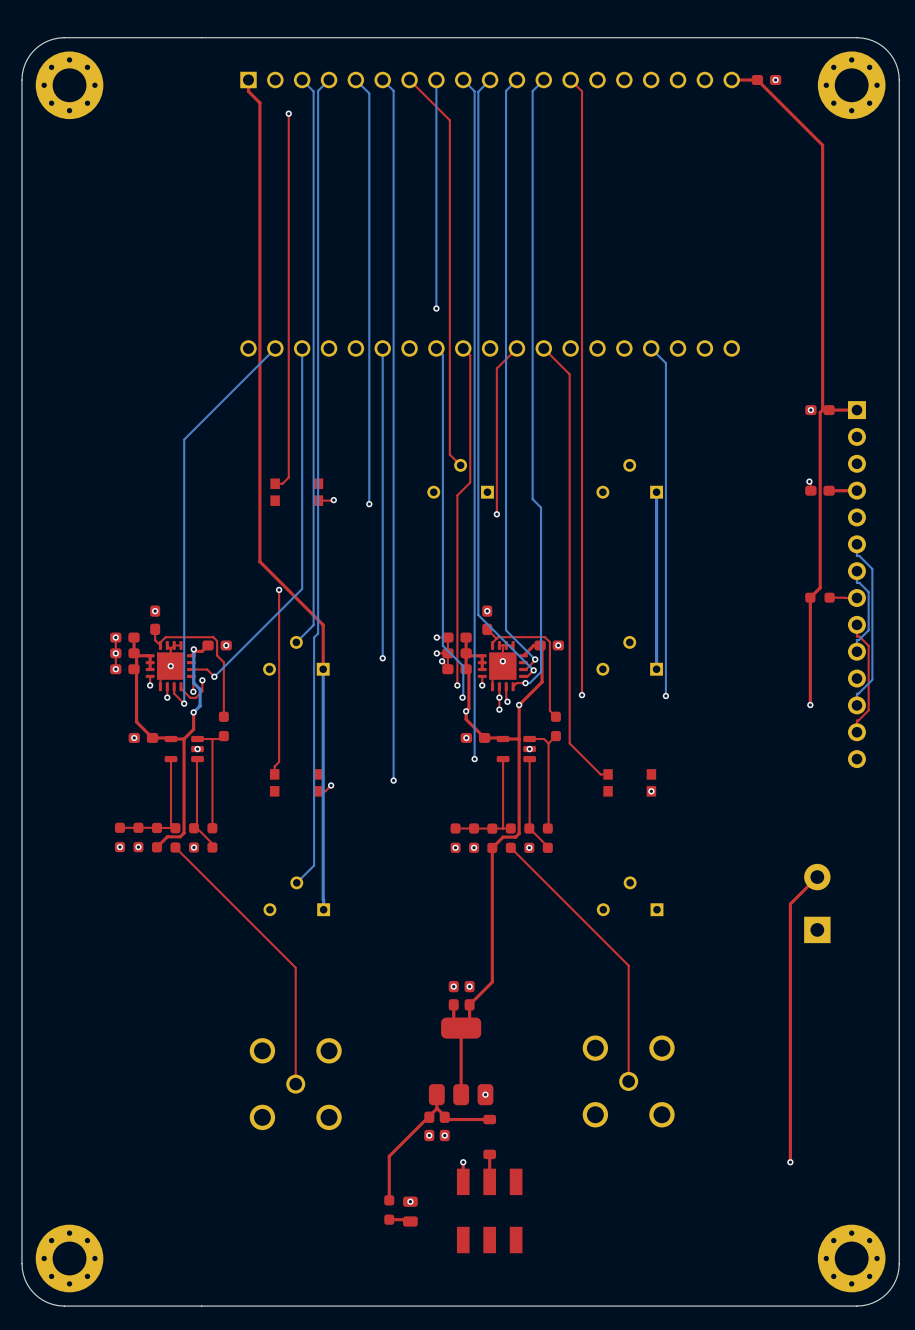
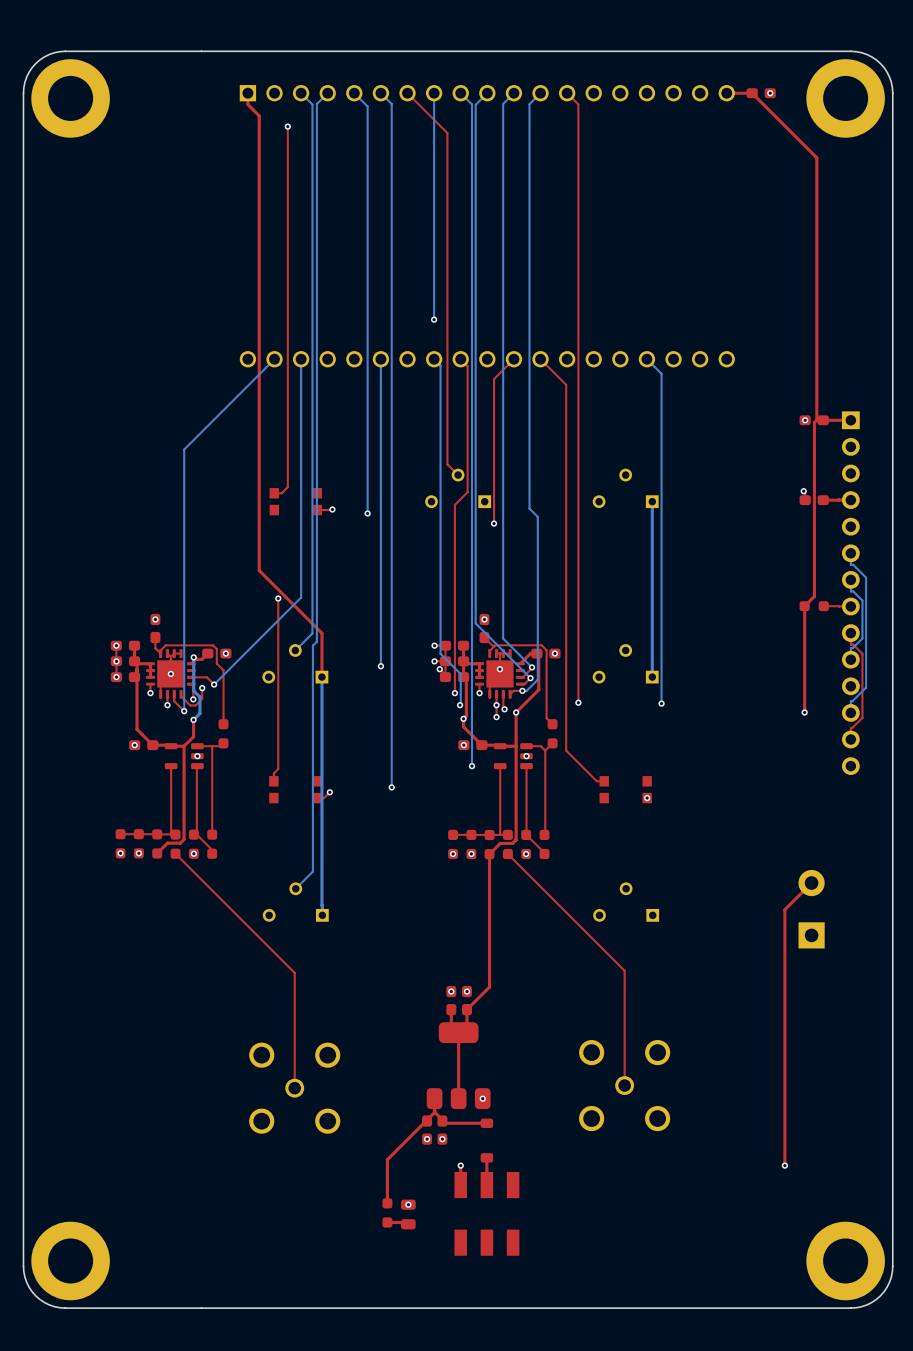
part footprint: [35, 51, 104, 120] -> [31, 59, 110, 138]
part footprint: [817, 51, 886, 120] -> [806, 59, 885, 138]
part footprint: [35, 1224, 104, 1293] -> [31, 1221, 110, 1301]
part footprint: [817, 1224, 886, 1293] -> [806, 1221, 885, 1301]

